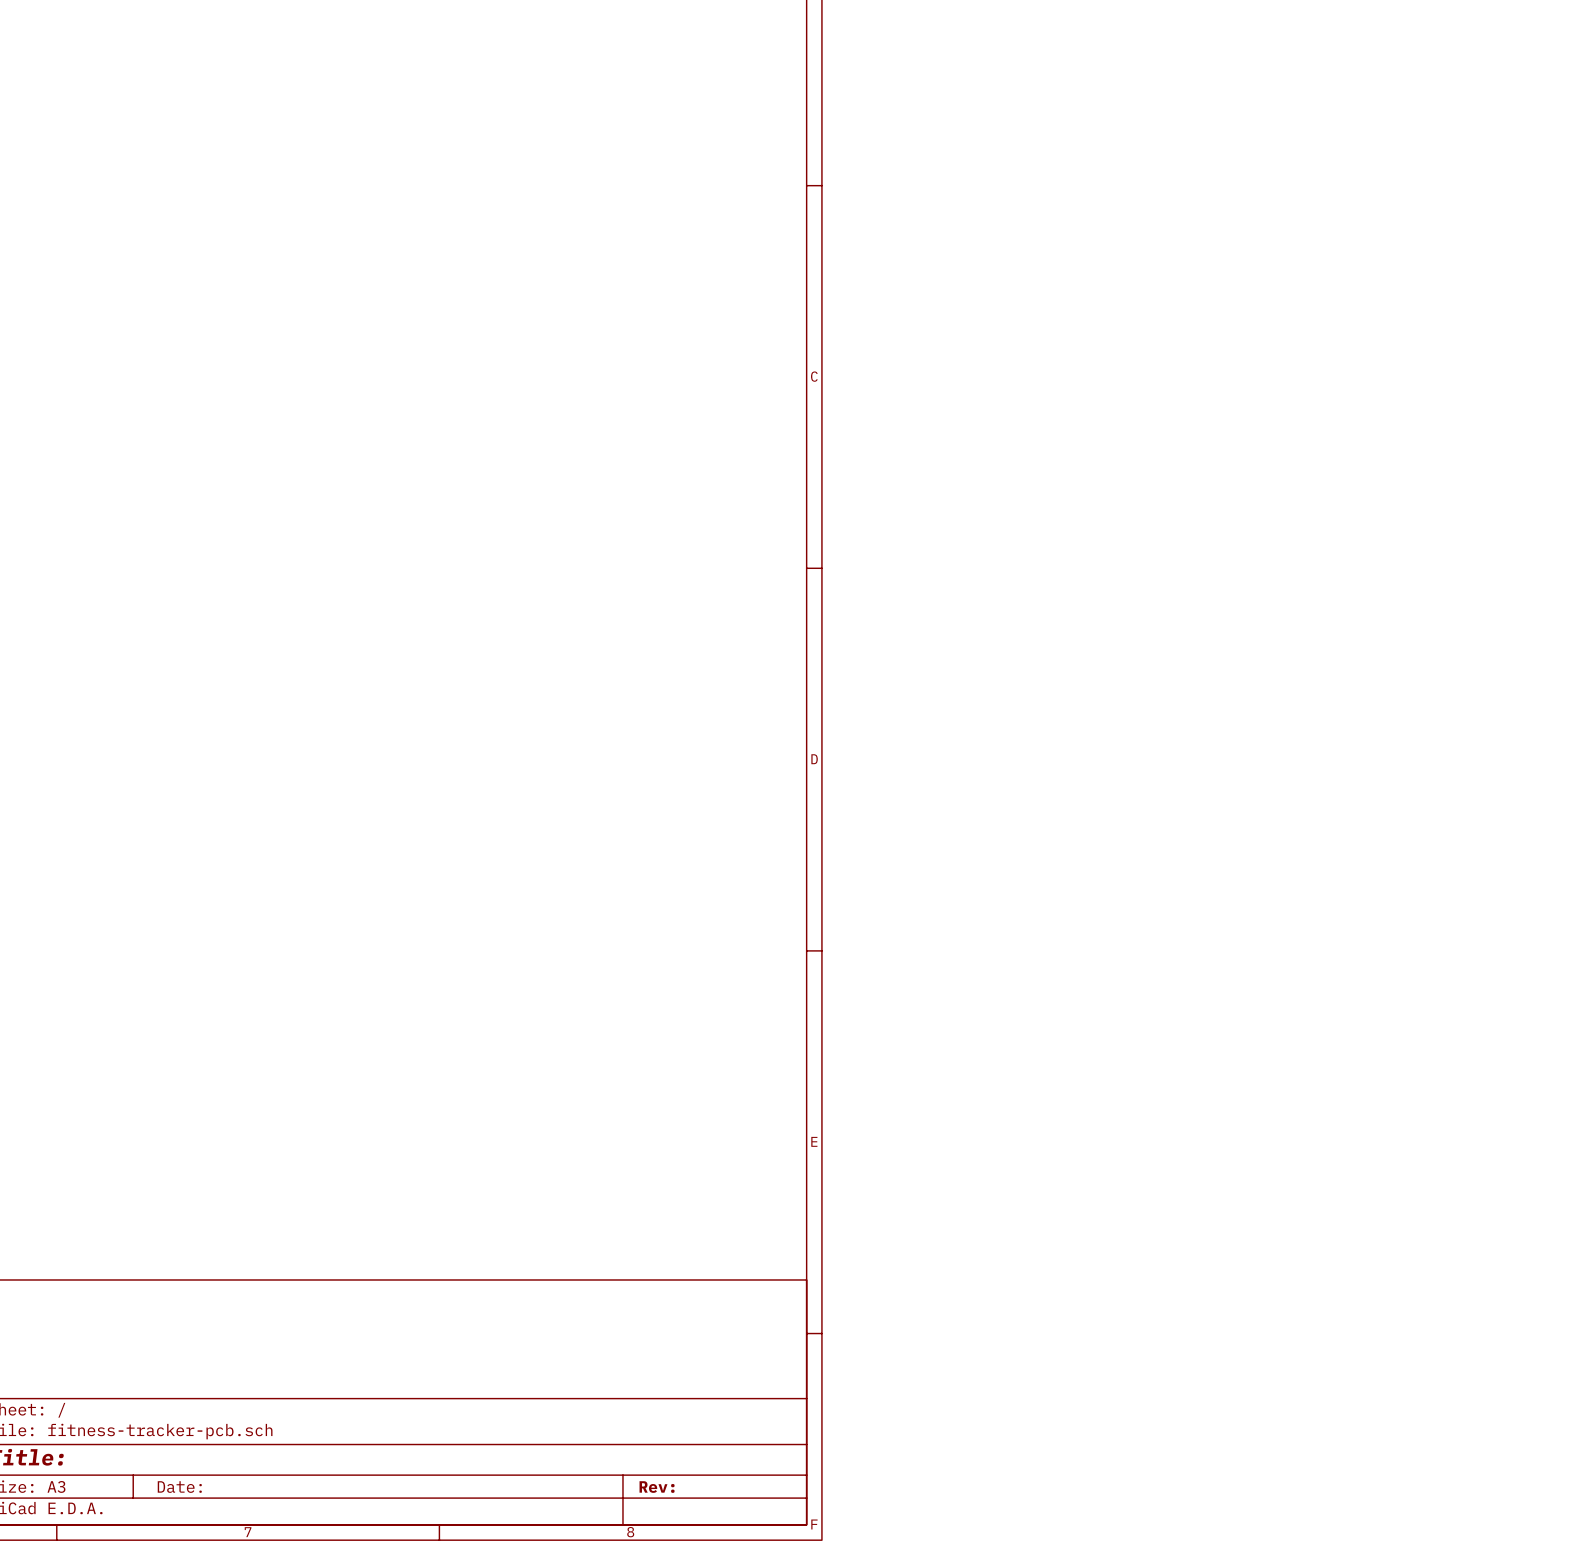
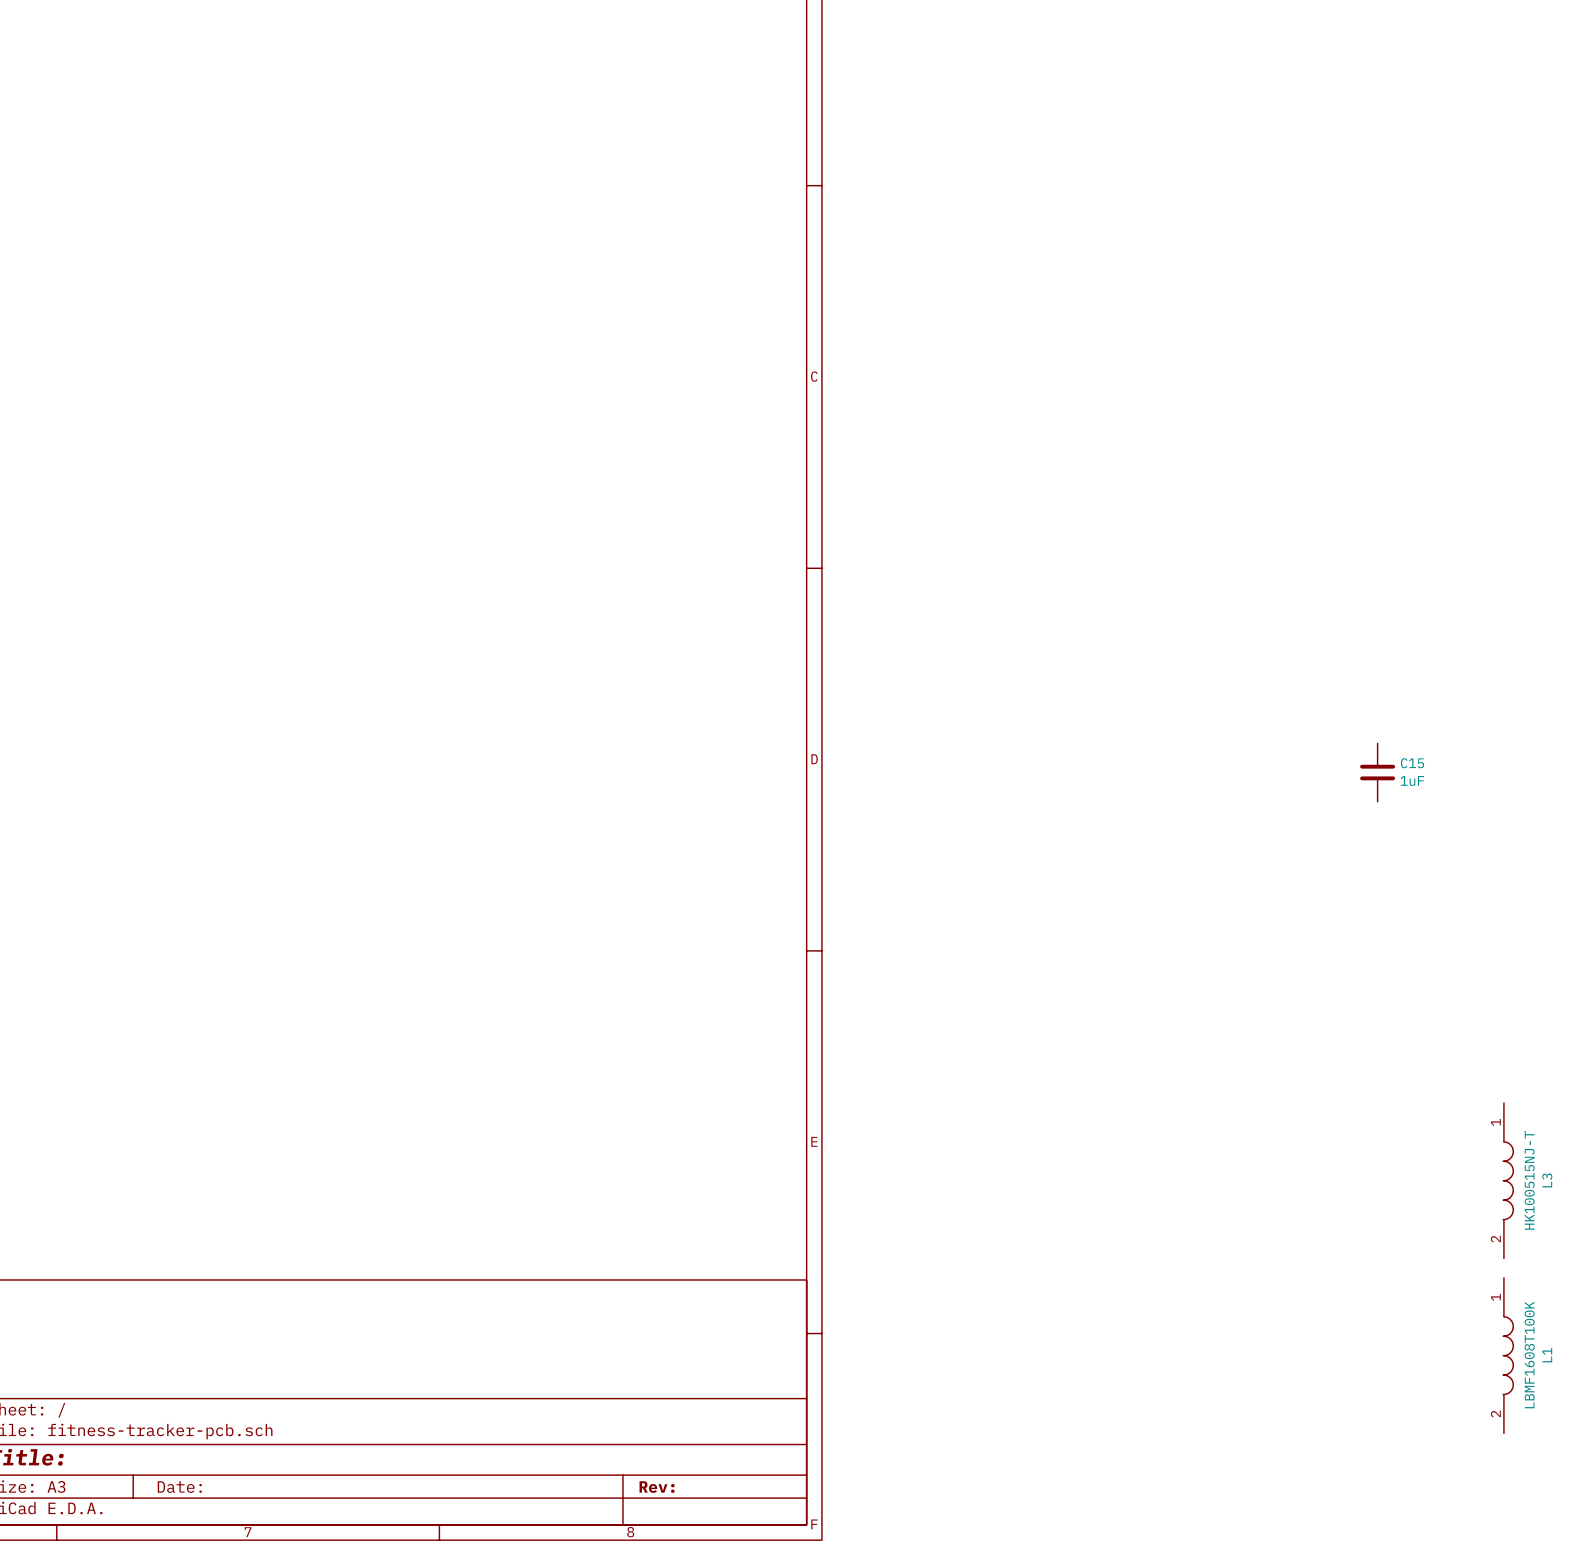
C15: none -> 1uF (1377, 772)
L3: none -> HK100515NJ-T (1508, 1180)
L1: none -> LBMF1608T100K (1508, 1355)

